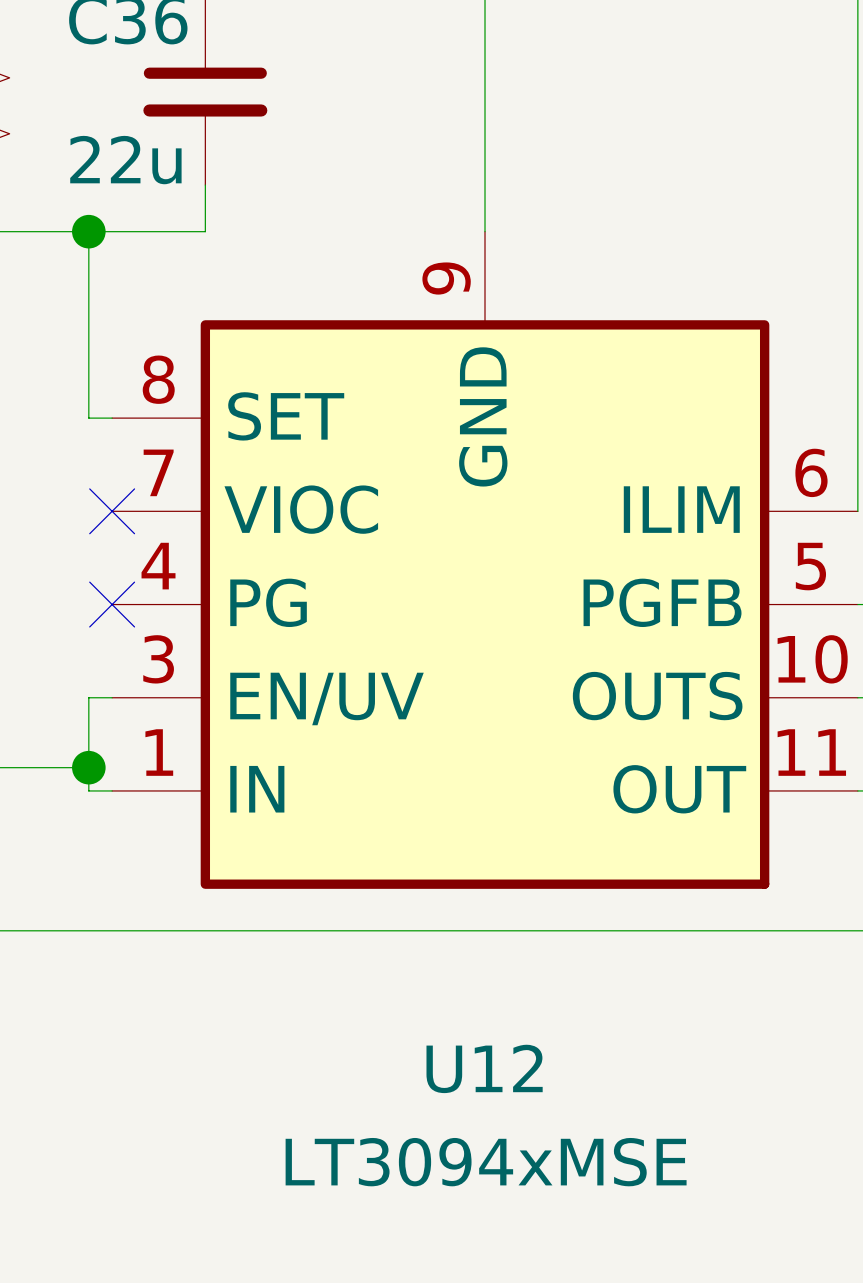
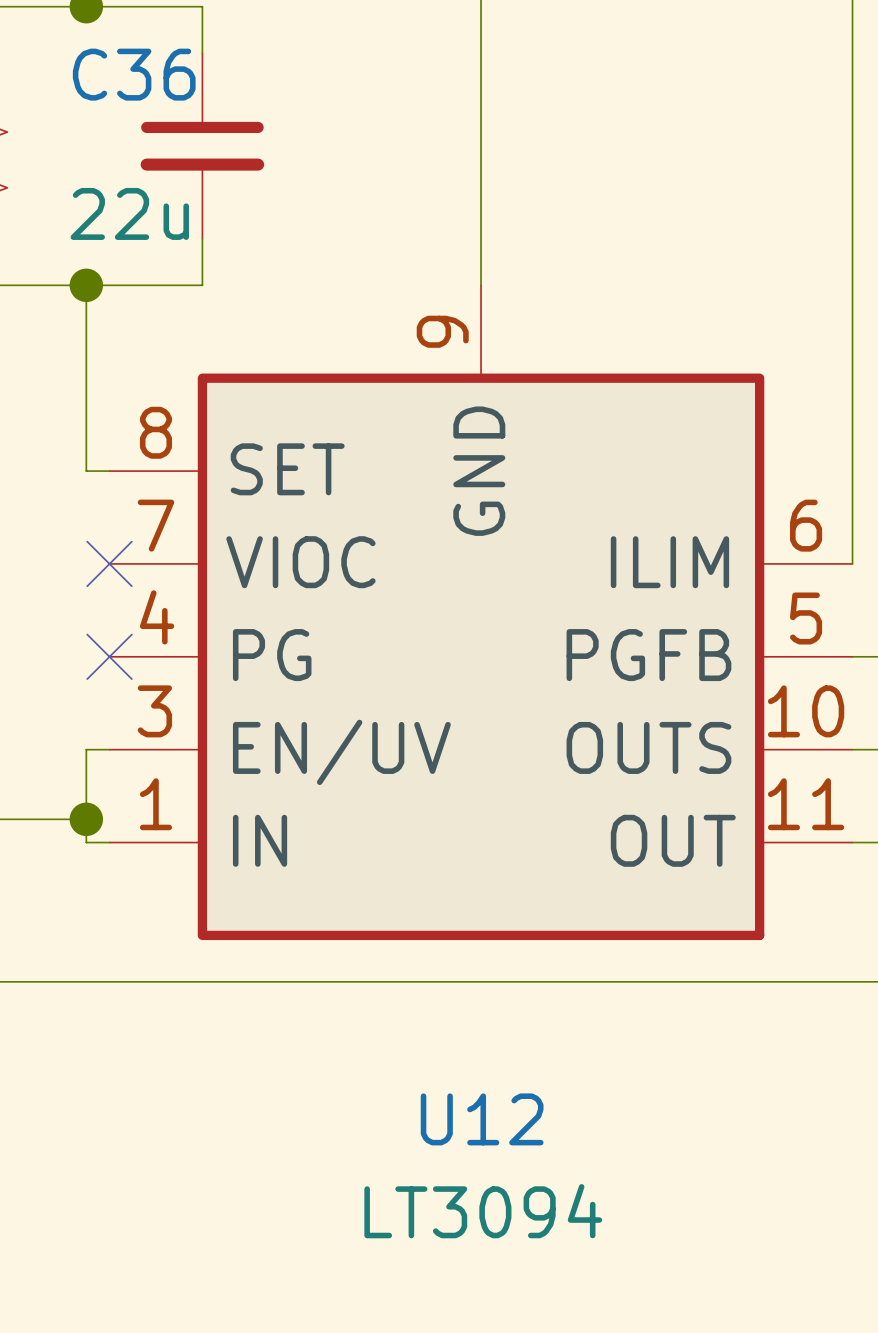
U12 value: LT3094xMSE (486, 1162) -> LT3094 (483, 1211)

